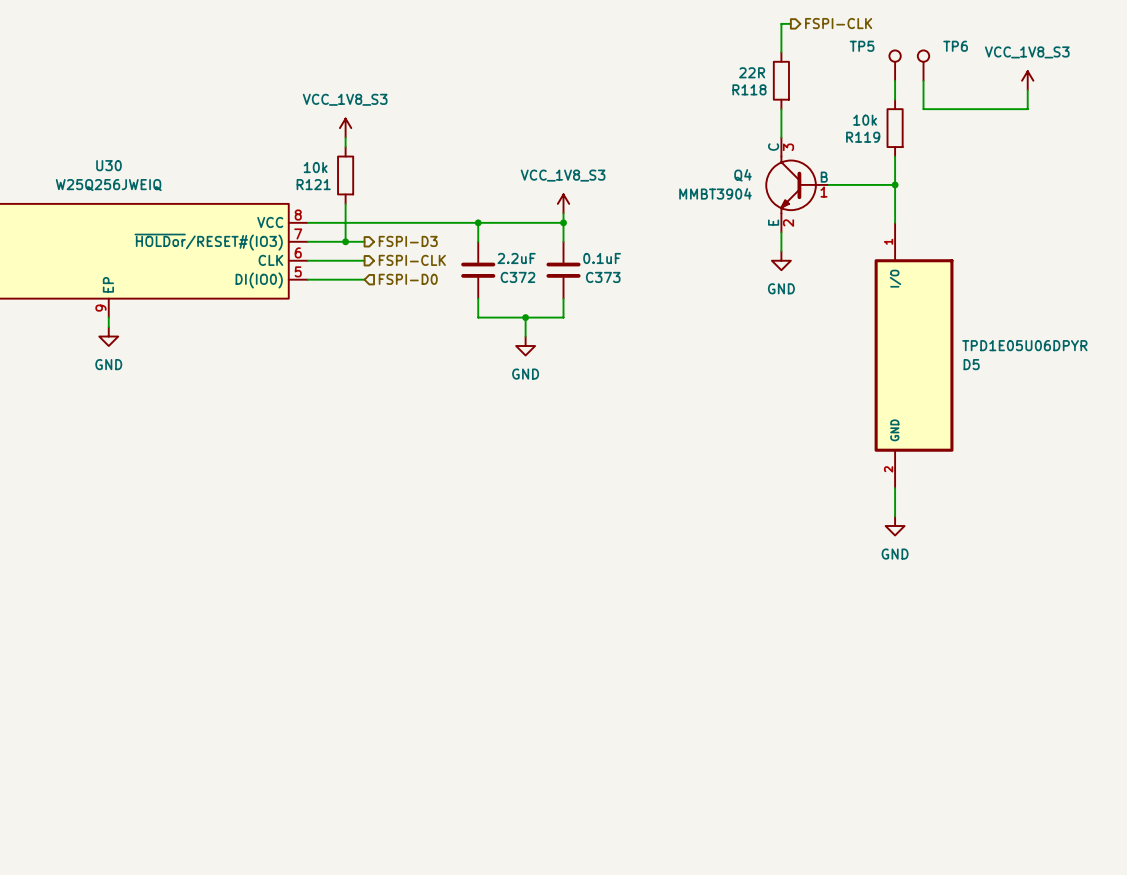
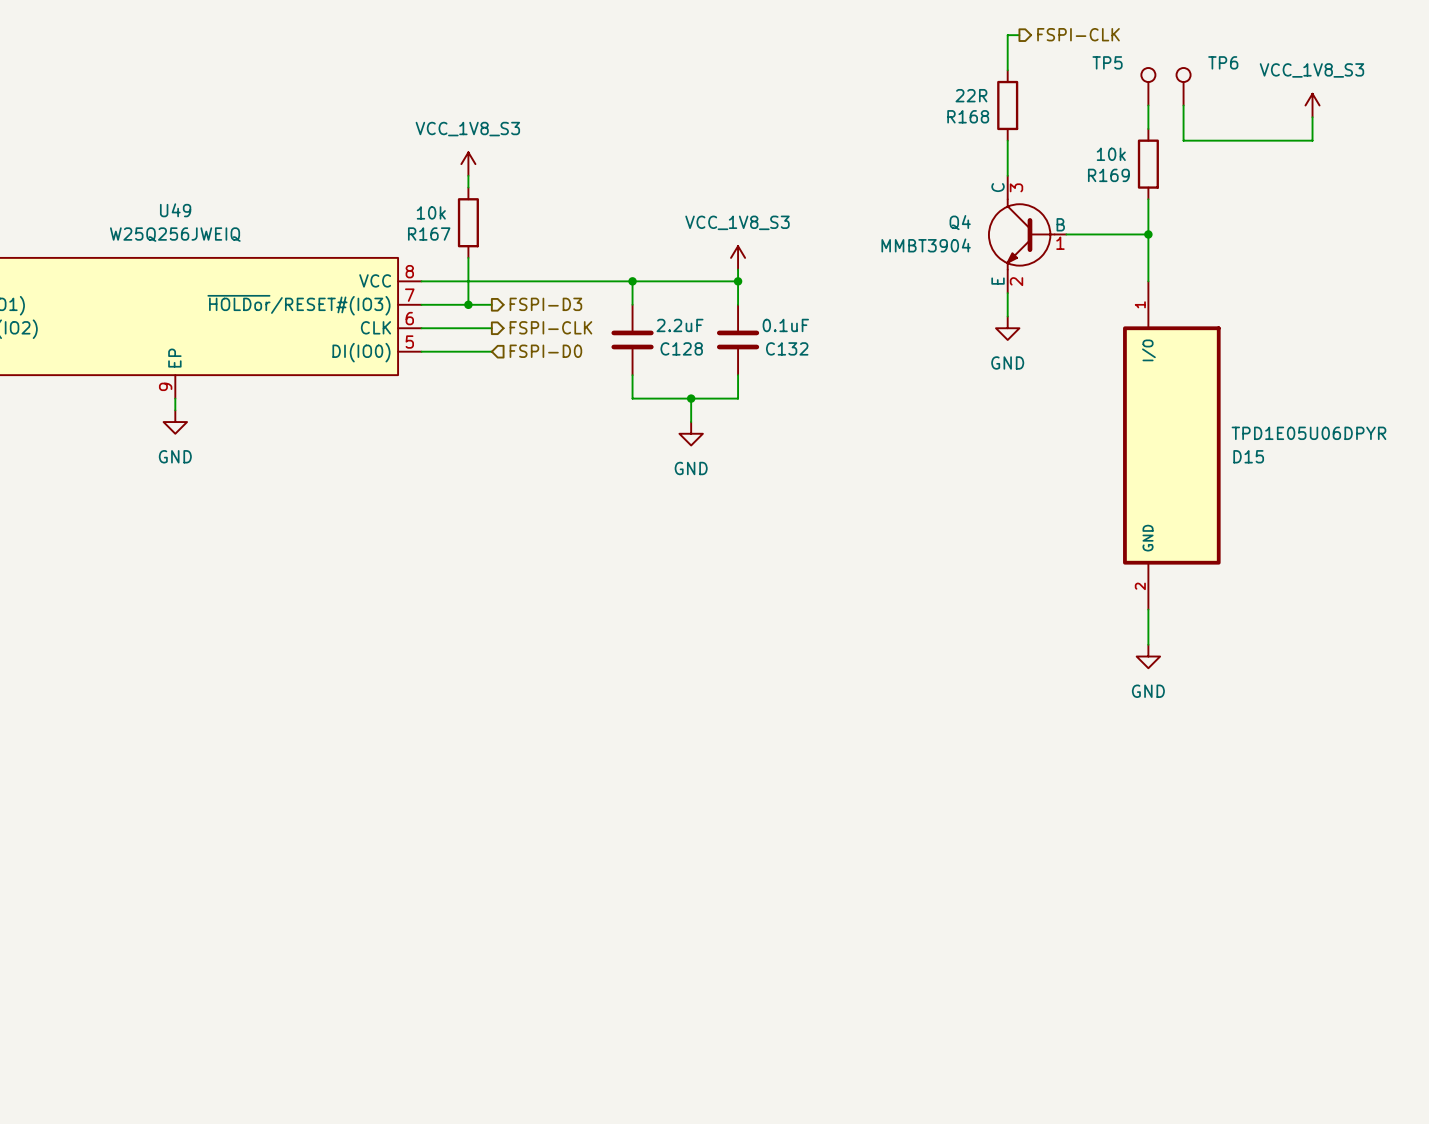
R118 name: R118 (749, 89) -> R168 (968, 116)
R119 name: R119 (863, 137) -> R169 (1108, 175)
U30 name: U30 (108, 165) -> U49 (175, 210)
R121 name: R121 (313, 184) -> R167 (429, 234)
C372 name: C372 (517, 277) -> C128 (681, 348)
C373 name: C373 (603, 277) -> C132 (787, 348)
D5 name: D5 (971, 364) -> D15 (1248, 456)

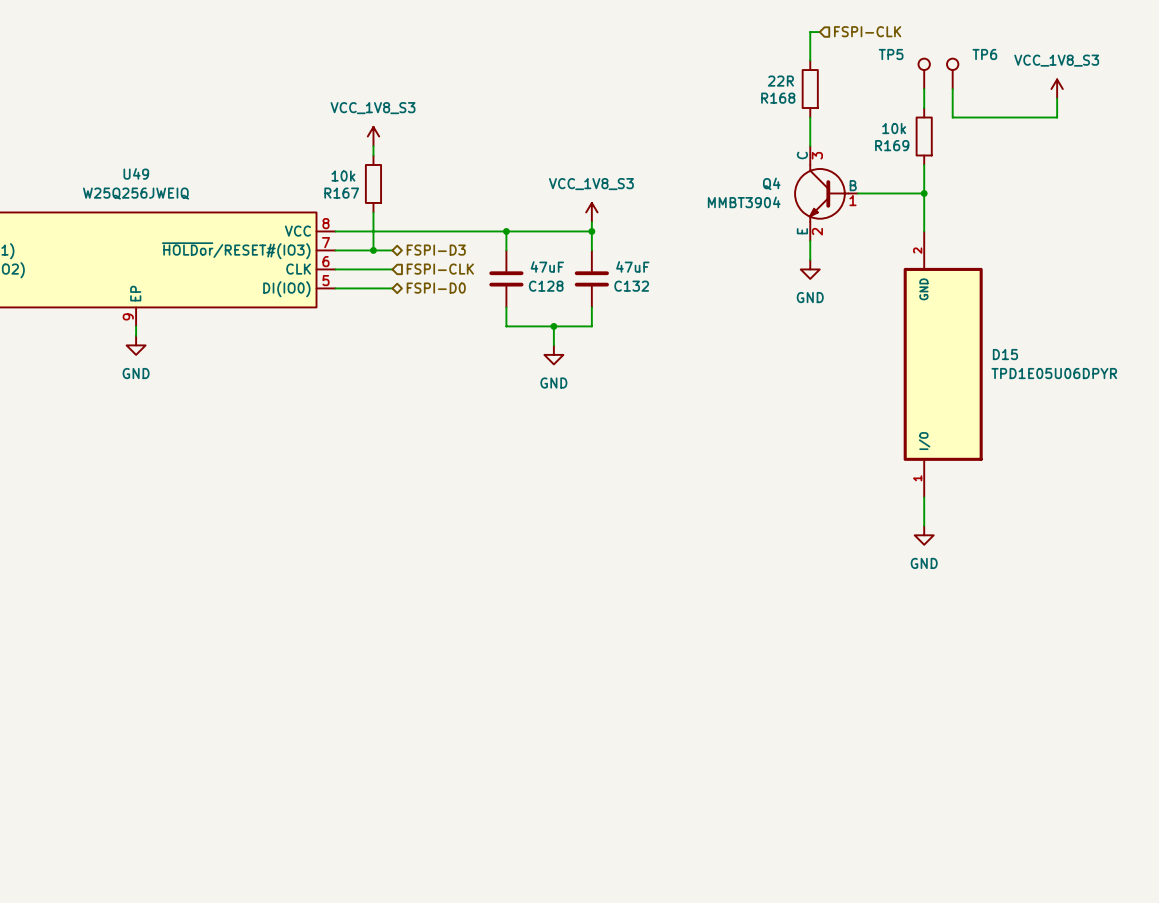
hierarchical label shape: output (1078, 34) -> input (867, 31)
hierarchical label shape: output (545, 304) -> bidirectional (436, 250)
C128 value: 2.2uF (680, 325) -> 47uF (547, 266)
C132 value: 0.1uF (785, 325) -> 47uF (632, 266)
hierarchical label shape: output (550, 327) -> input (440, 269)
hierarchical label shape: input (545, 351) -> bidirectional (436, 288)
D15 flip: as is (1171, 445) -> up-down (943, 364)

